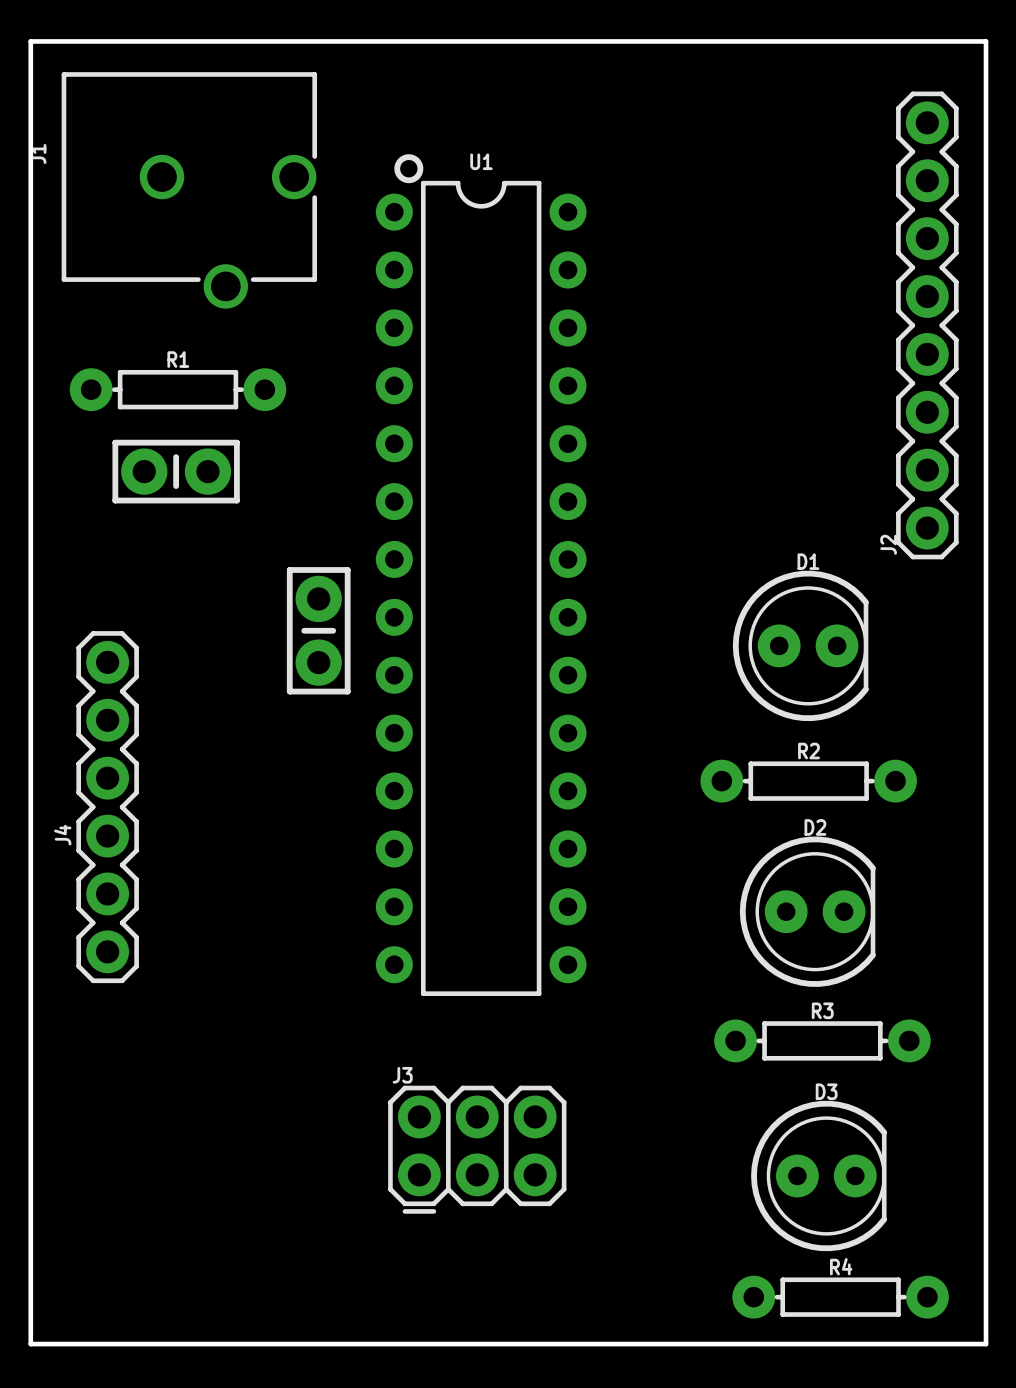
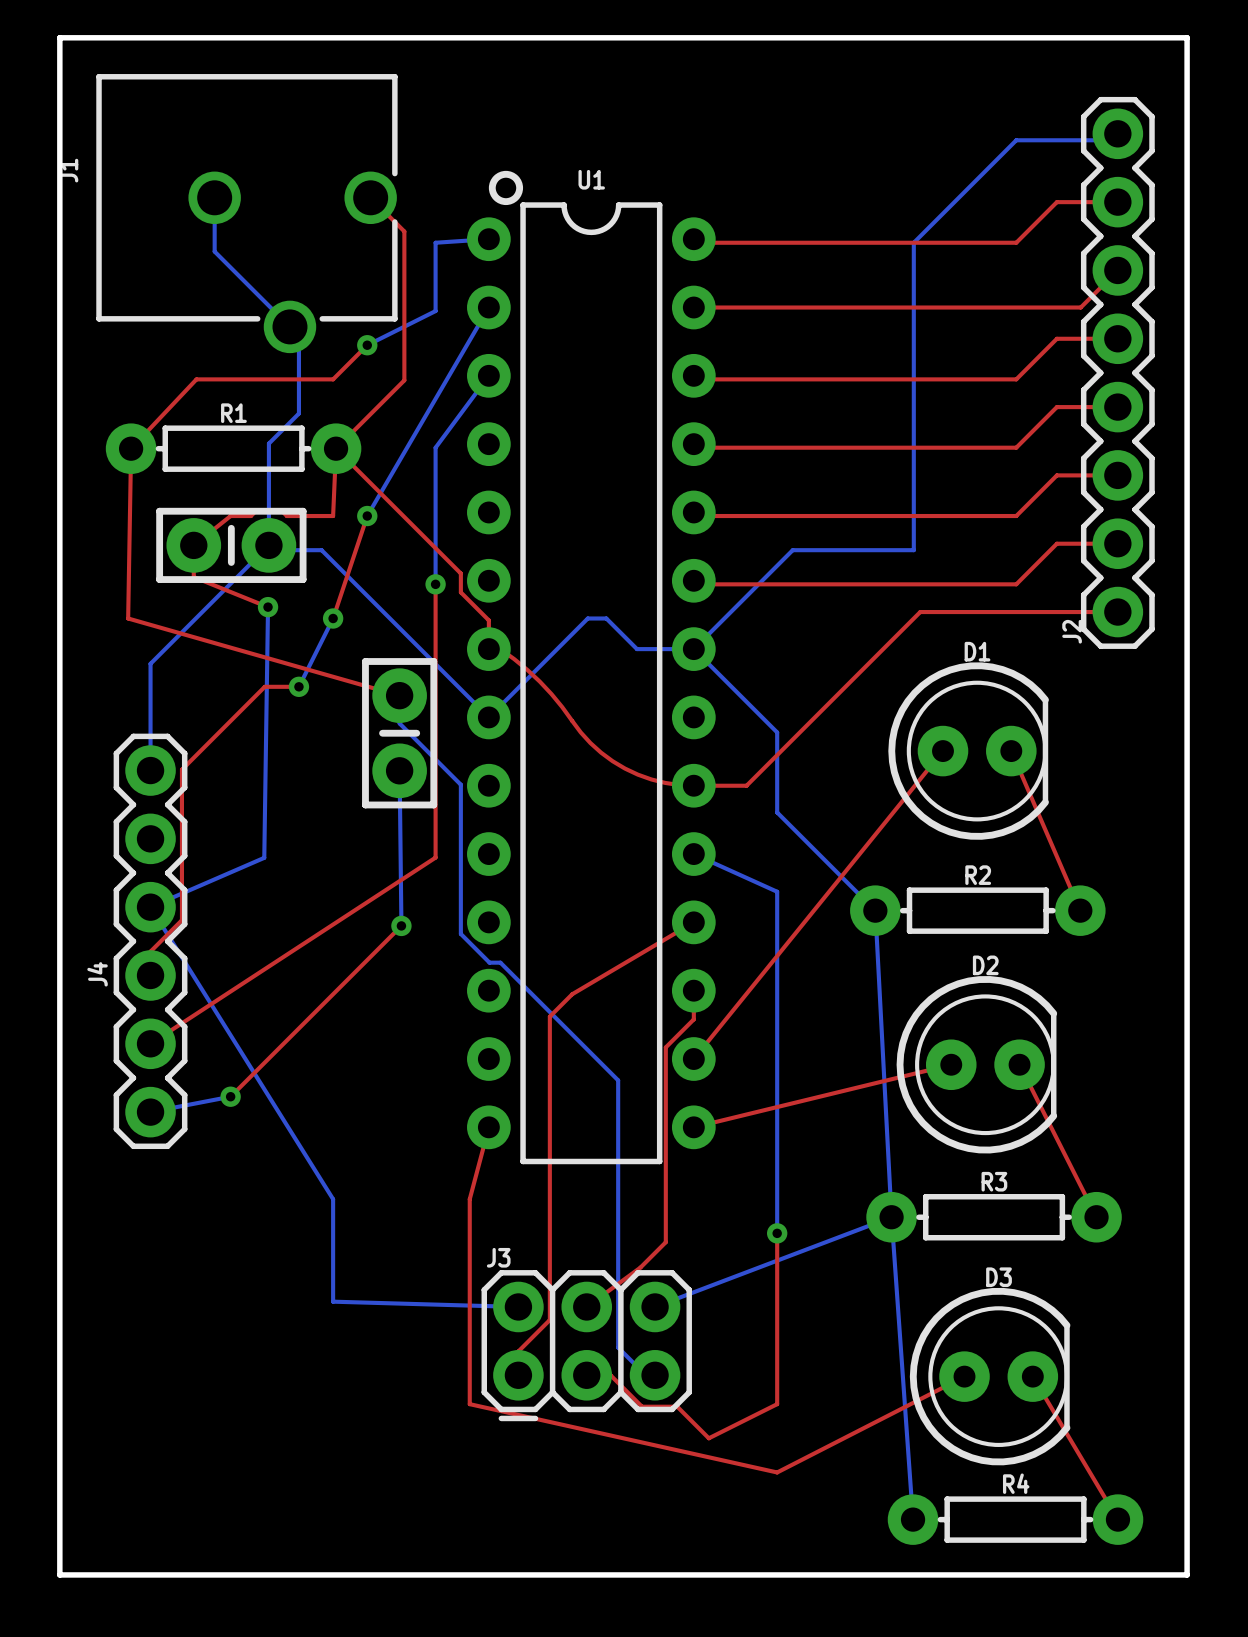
bottom track: none -> (1117, 133) (1111, 140) (1016, 140) (913, 242) (913, 550) (792, 550) (693, 649)
bottom track: none -> (214, 197) (214, 251) (298, 335) (298, 413) (268, 443) (268, 545) (150, 663) (150, 770)
top track: none -> (370, 197) (404, 231) (404, 380) (336, 448)
top track: none -> (1117, 202) (1056, 202) (1016, 242) (697, 242) (693, 239)
bottom track: none -> (488, 239) (435, 242) (435, 311) (367, 345)
top track: none -> (1117, 270) (1080, 307) (693, 307)
bottom track: none -> (488, 307) (367, 516)
top track: none -> (1117, 338) (1056, 338) (1016, 379) (697, 379) (693, 375)
top track: none -> (367, 345) (333, 379) (196, 379) (131, 448) (128, 618) (399, 695)
via: none -> (367, 345)
bottom track: none -> (488, 375) (435, 447) (435, 584)
top track: none -> (1117, 407) (1056, 407) (1016, 447) (697, 447) (693, 444)
top track: none -> (336, 448) (460, 573) (460, 592) (488, 620) (488, 649) (500, 649) (527, 669) (551, 693) (580, 732) (601, 752) (637, 774) (665, 782) (693, 785) (746, 785) (920, 612) (1117, 612)
top track: none -> (336, 448) (333, 516) (286, 516) (282, 511) (255, 511) (250, 516) (230, 516) (193, 545) (193, 577) (268, 607)
top track: none -> (1117, 475) (1056, 475) (1016, 516) (697, 516) (693, 512)
top track: none -> (367, 516) (333, 618)
via: none -> (367, 516)
top track: none -> (1117, 543) (1056, 543) (1016, 584) (697, 584) (693, 580)
bottom track: none -> (264, 549) (321, 550) (488, 717) (587, 618) (606, 618) (636, 649) (693, 649)
top track: none -> (435, 584) (435, 857) (150, 1043)
via: none -> (435, 584)
bottom track: none -> (268, 607) (264, 857) (150, 907) (333, 1199) (333, 1301) (518, 1306)
via: none -> (268, 607)
bottom track: none -> (333, 618) (298, 686)
via: none -> (333, 618)
bottom track: none -> (693, 649) (777, 732) (777, 812) (875, 910) (891, 1217)
top track: none -> (298, 686) (264, 686) (181, 769) (181, 920) (150, 951) (150, 975)
via: none -> (298, 686)
bottom track: none -> (399, 695) (399, 723) (460, 784) (460, 933) (489, 962) (500, 962) (618, 1080) (618, 1347) (640, 1369)
top track: none -> (942, 751) (693, 1059)
top track: none -> (1011, 751) (1080, 910)
bottom track: none -> (399, 770) (401, 925)
bottom track: none -> (693, 854) (777, 891) (777, 1233)
top track: none -> (693, 922) (572, 994) (549, 1016) (549, 1319) (518, 1351) (518, 1375)
top track: none -> (401, 925) (230, 1096)
via: none -> (401, 925)
top track: none -> (693, 990) (693, 1019) (665, 1047) (665, 1242) (640, 1267) (586, 1306)
top track: none -> (951, 1064) (693, 1127)
top track: none -> (1019, 1064) (1096, 1217)
bottom track: none -> (230, 1096) (150, 1112)
via: none -> (230, 1096)
top track: none -> (488, 1127) (469, 1199) (469, 1404) (777, 1472) (964, 1376)
bottom track: none -> (891, 1217) (913, 1519)
bottom track: none -> (891, 1217) (655, 1306)
top track: none -> (777, 1233) (777, 1404) (708, 1438) (677, 1406) (642, 1406) (610, 1375) (586, 1375)
via: none -> (777, 1233)
top track: none -> (1032, 1376) (1117, 1519)

